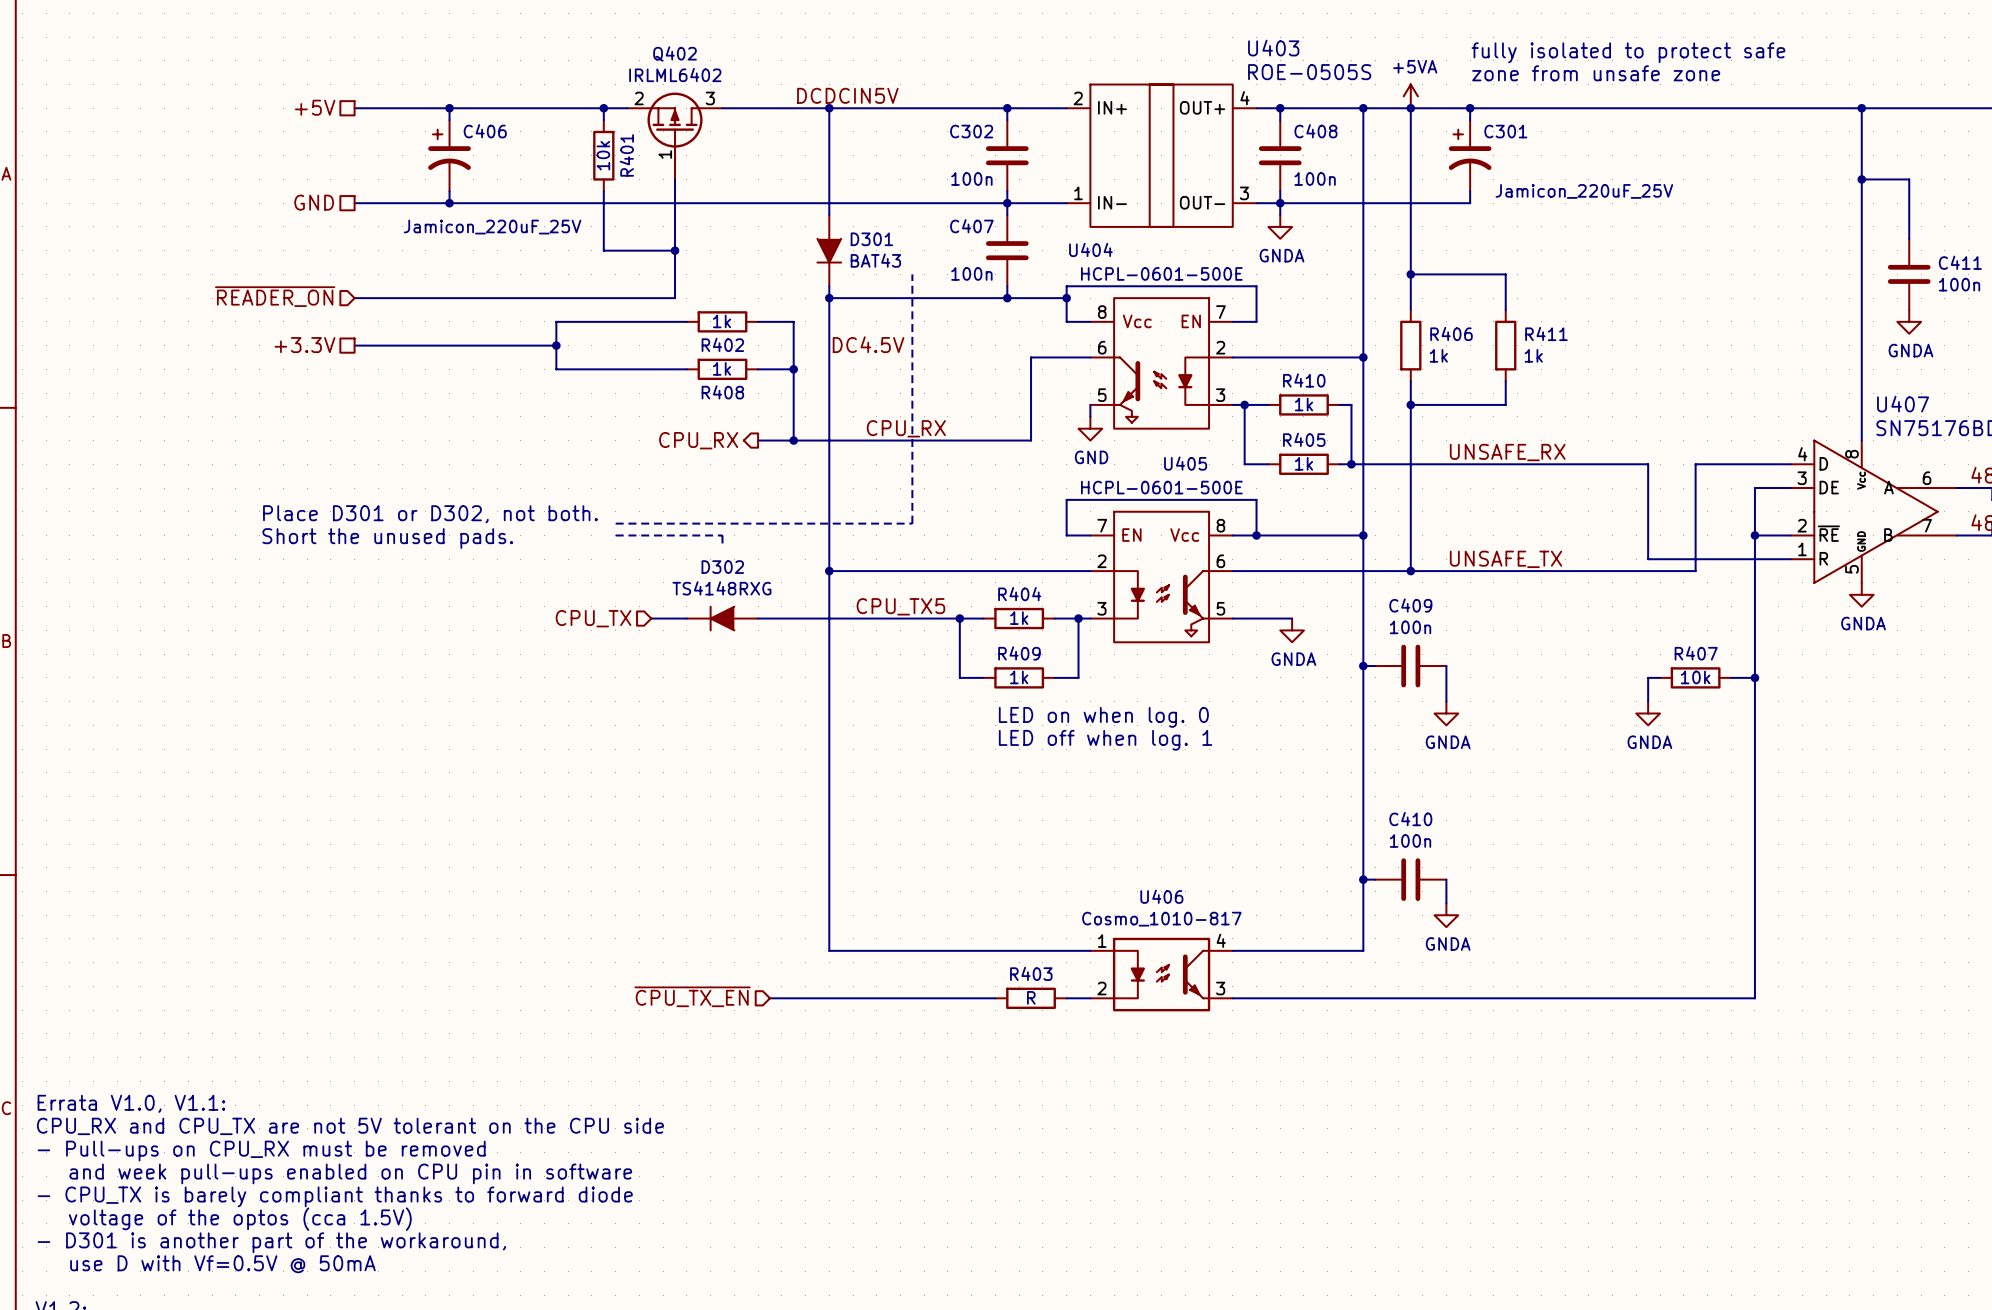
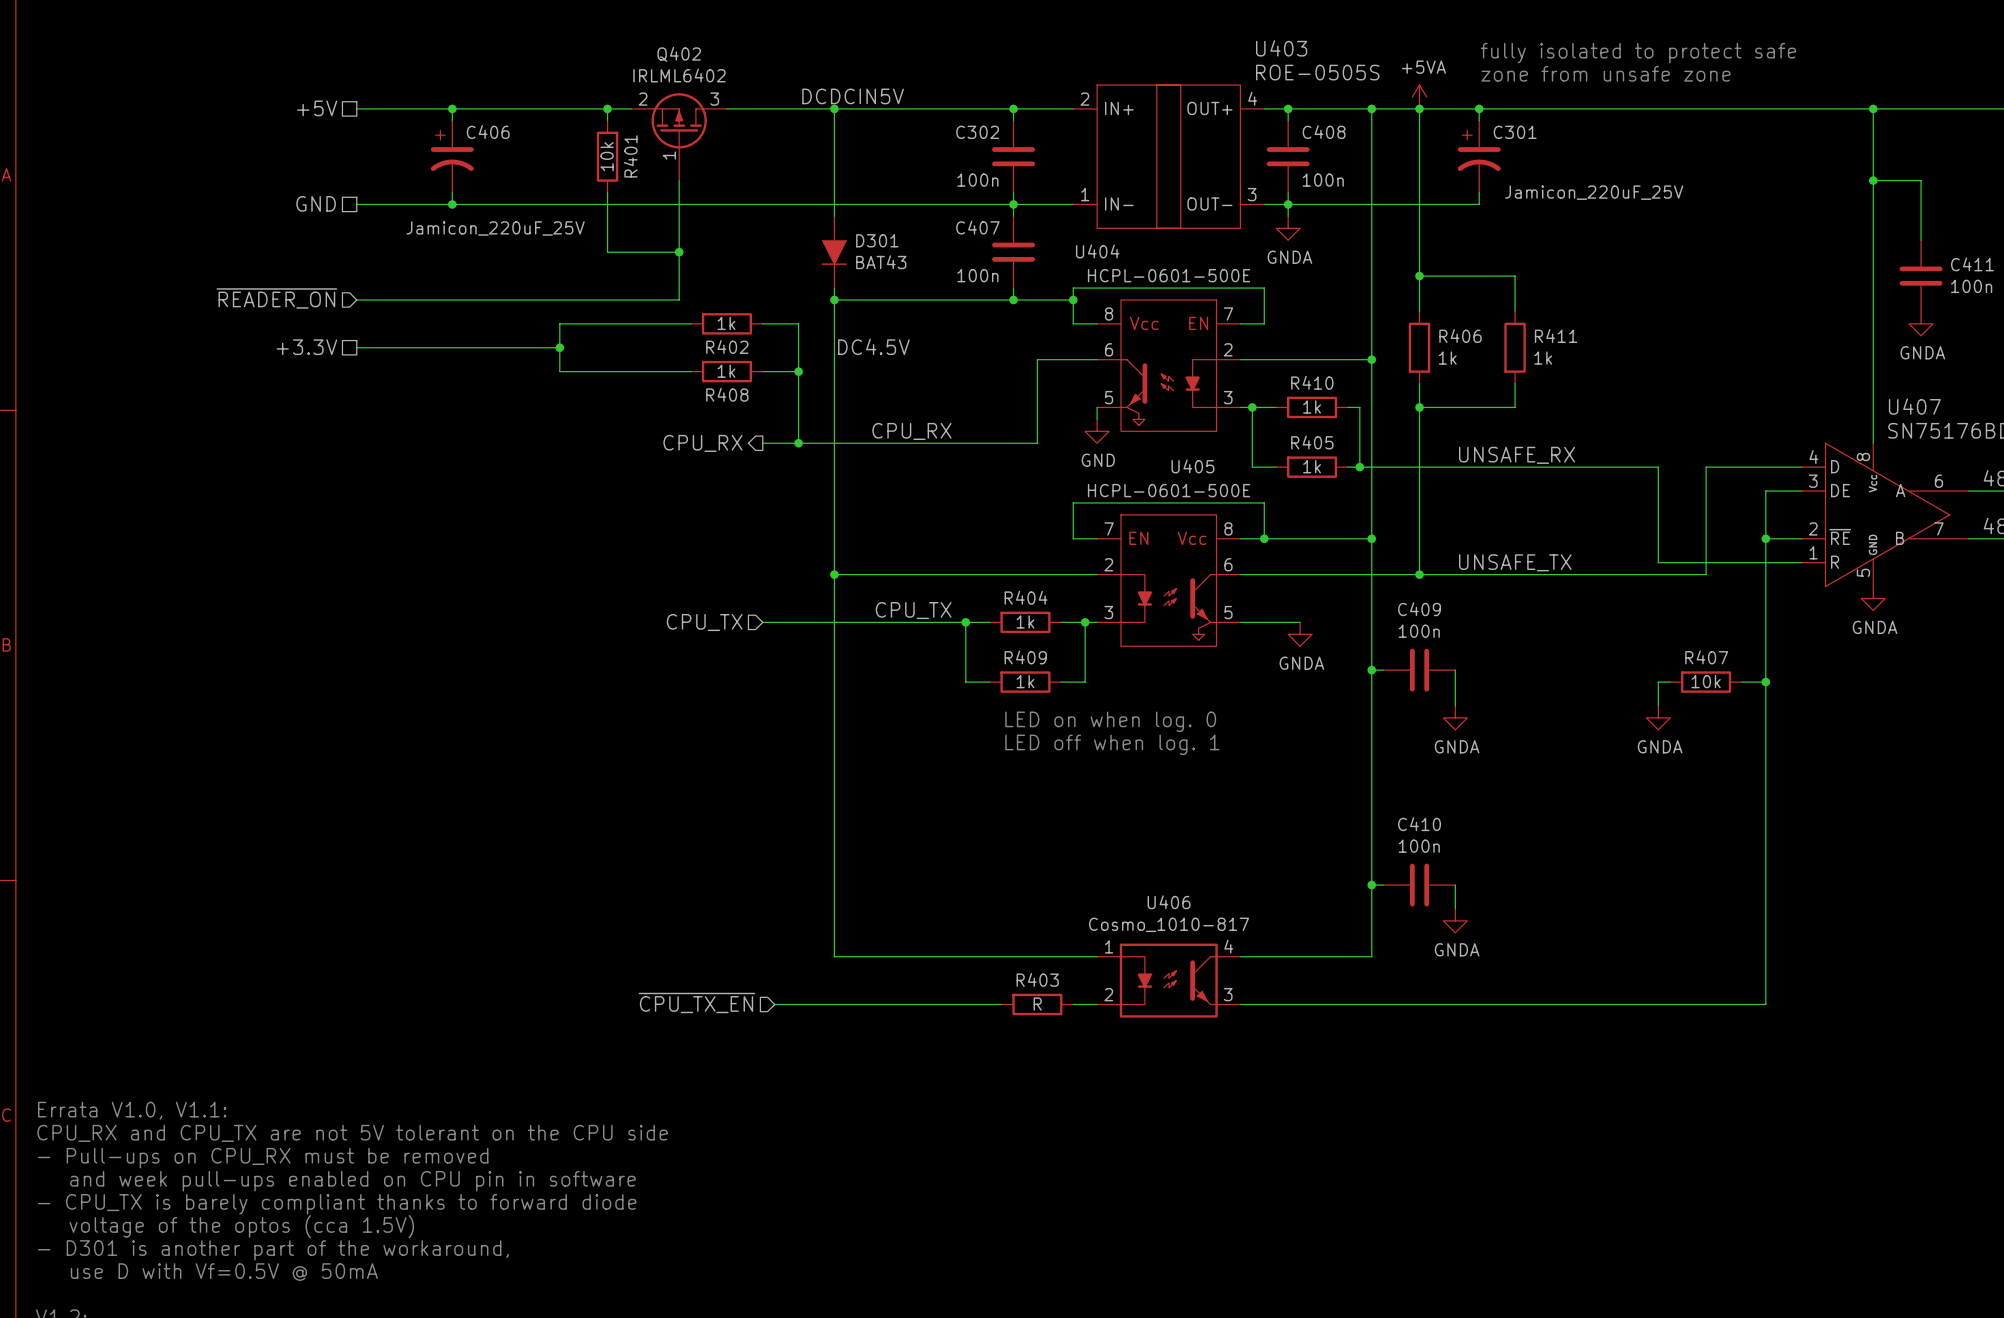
line: (912, 274) (912, 523) (615, 523) -> none
text: Place D301 or D302, not both. (430, 514) -> none
line: (615, 535) (722, 535) (722, 547) -> none
text: Short the unused pads. (387, 538) -> none
label: CPU_TX5 (900, 606) -> CPU_TX (913, 610)
hierarchical label position: CPU_TX (593, 618) -> CPU_TX (704, 622)
wire: (651, 618) (686, 618) -> none
D302: TS4148RXG (722, 618) -> none

